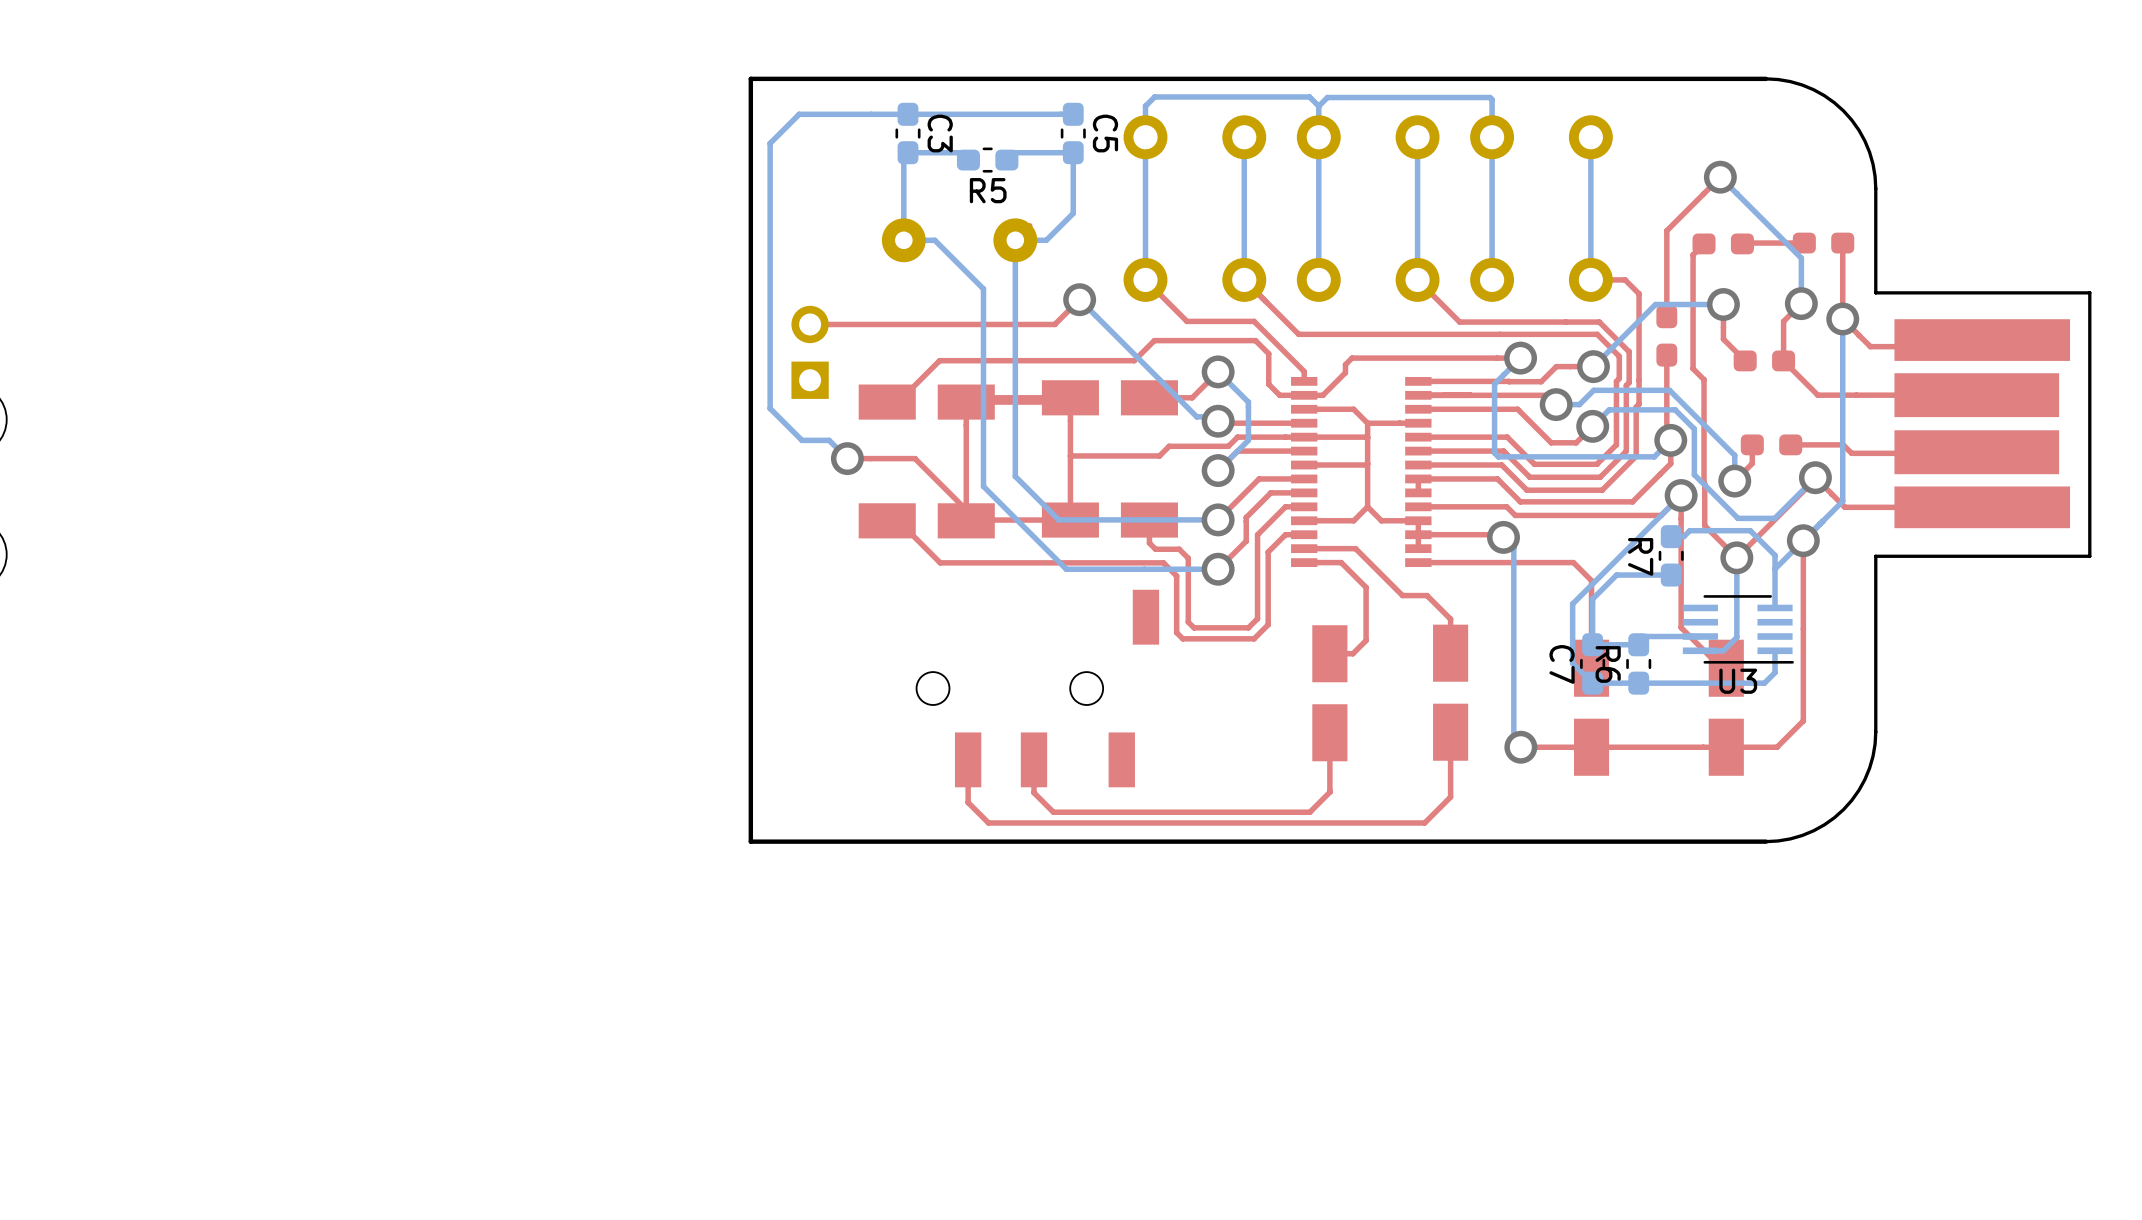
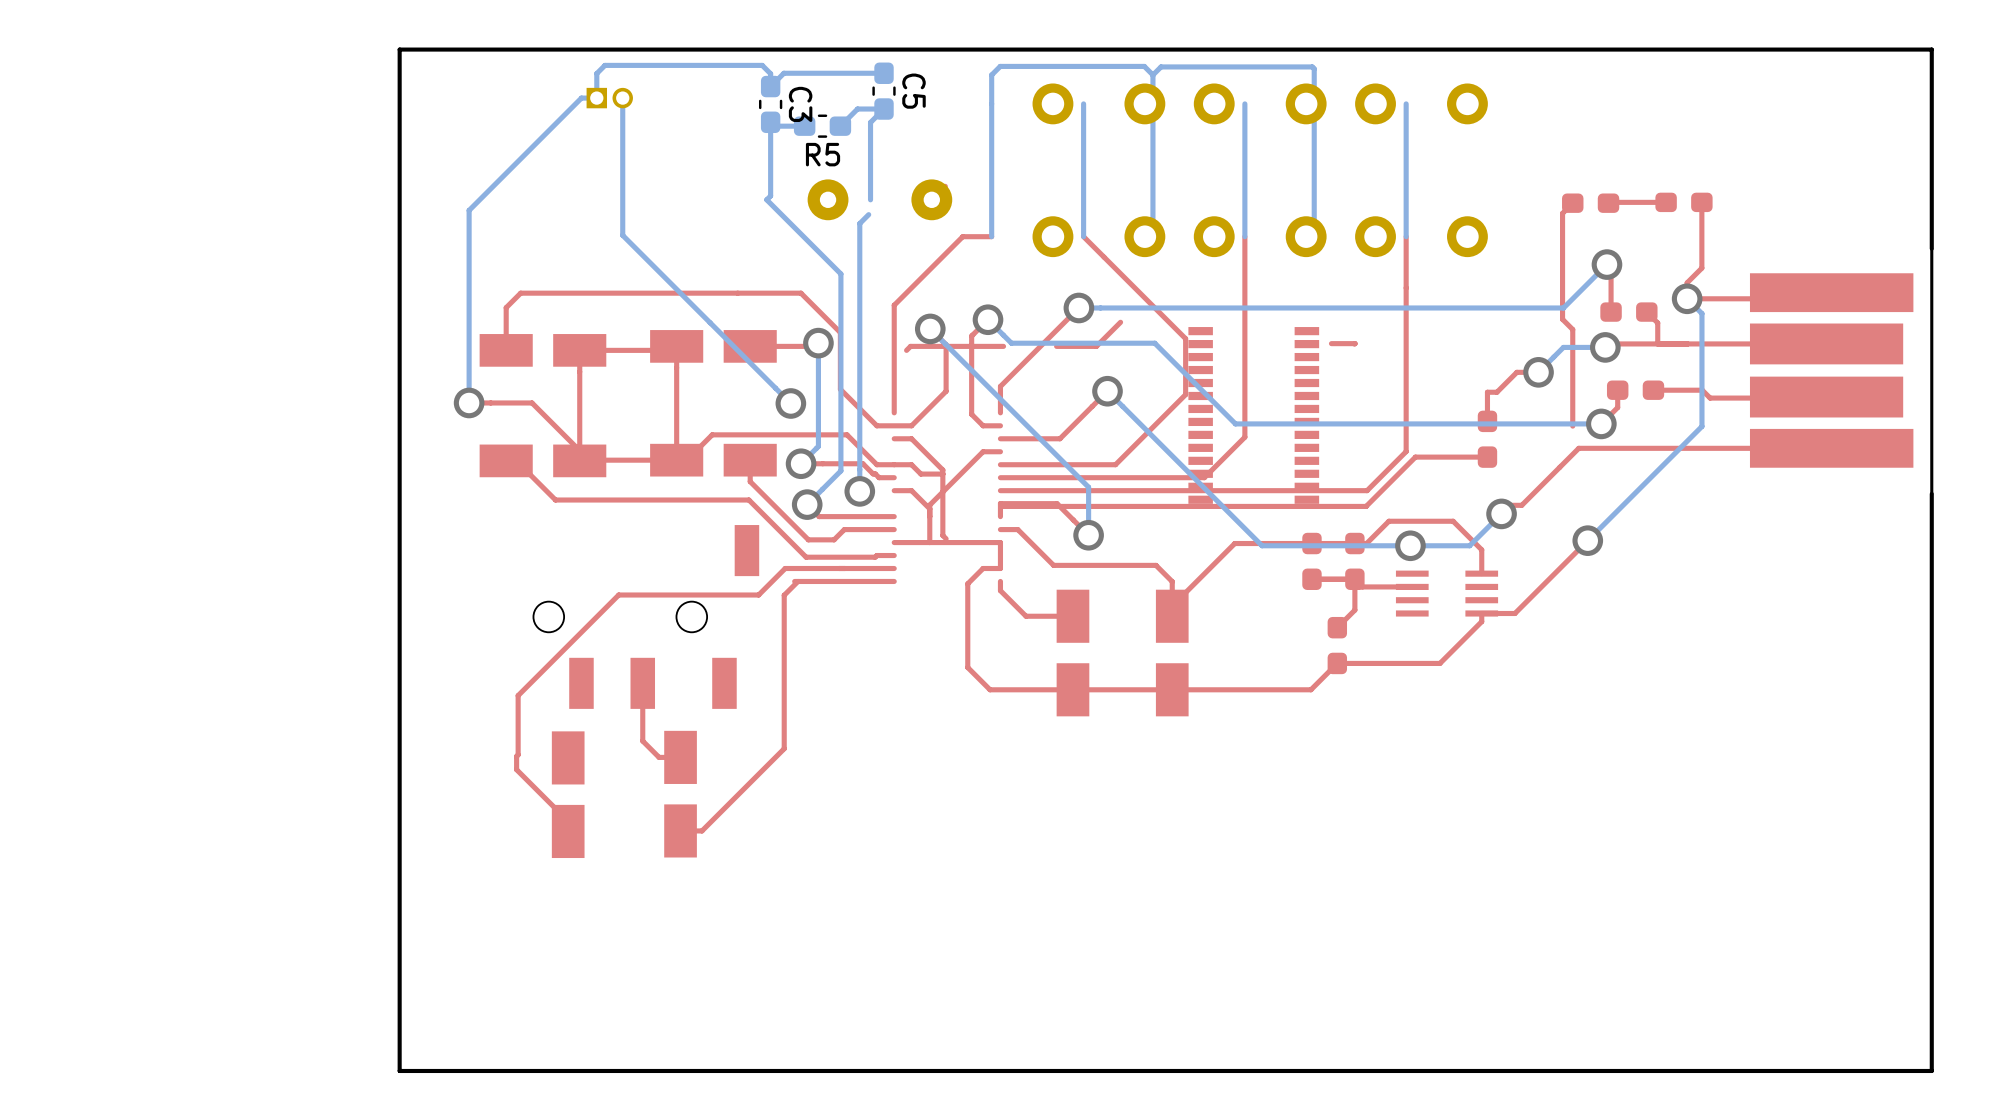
board edge: (750, 78) (750, 841) (1766, 841) (1790, 838) (1813, 830) (1834, 817) (1858, 790) (1869, 768) (1875, 731) (1875, 556) (2089, 556) -> (685, 49) (399, 49) (399, 1070) (1931, 1070) (1931, 493)
board edge: (1766, 78) (1802, 85) (1824, 95) (1851, 120) (1864, 140) (1875, 176) (1875, 292) (2089, 292) -> (1630, 49) (1931, 49) (1931, 248)
bottom track: (1154, 96) (1145, 106) (1145, 279) -> (1061, 66) (1000, 66) (991, 75) (991, 236)
bottom track: (1243, 96) (1309, 96) (1318, 106) -> (1144, 66) (1152, 75)
bottom track: (1327, 97) (1318, 106) -> (1222, 66) (1161, 66) (1152, 75)
bottom track: (1424, 97) (1490, 97) (1492, 99) (1492, 279) -> (1312, 66) (1314, 68) (1314, 236)
bottom track: none -> (884, 73) (783, 73) (770, 86) (770, 73) (762, 65) (604, 65) (596, 73) (596, 98) (581, 98) (469, 210) (469, 402)
bottom track: (1318, 106) (1318, 279) -> (1152, 75) (1152, 236)
bottom track: (1073, 114) (799, 114) (770, 143) (770, 408) (801, 440) (829, 440) (847, 458) -> none
part: none -> (609, 98)
bottom track: none -> (622, 98) (622, 235) (790, 403)
C3 position: (907, 133) -> (770, 104)
C5 position: (1073, 133) -> (884, 91)
bottom track: (1244, 137) (1244, 279) -> (1083, 103) (1083, 236)
bottom track: (1417, 137) (1417, 279) -> (1244, 103) (1244, 236)
bottom track: (1590, 137) (1590, 279) -> (1406, 103) (1406, 236)
bottom track: (968, 160) (961, 152) (907, 152) (903, 156) (903, 240) (934, 240) (983, 288) (983, 486) (1066, 569) (1218, 569) -> none
R5 position: (987, 160) -> (822, 126)
bottom track: (1006, 160) (1014, 152) (1073, 152) (1073, 213) (1046, 240) (1015, 240) (1015, 476) (1058, 519) (1218, 519) -> none
bottom track: none -> (804, 126) (774, 126) (770, 122) (770, 195) (766, 199) (840, 273) (840, 470) (807, 504)
bottom track: none -> (840, 126) (857, 109) (884, 109) (870, 122) (870, 199)
top track: (1720, 177) (1666, 230) (1666, 316) -> none
bottom track: (1720, 177) (1801, 258) (1801, 303) -> none
via: (1720, 177) -> none
bottom track: none -> (868, 214) (859, 223) (859, 491)
top track: none -> (991, 236) (962, 236) (894, 305) (894, 412)
top track: (1145, 279) (1186, 321) (1254, 321) (1304, 371) (1304, 381) -> none
top track: none -> (1083, 236) (1185, 338) (1185, 394) (1115, 464) (1000, 464)
top track: (1244, 279) (1298, 334) (1597, 334) (1619, 356) (1619, 378) (1616, 381) (1616, 444) (1596, 464) (1534, 464) (1507, 437) (1418, 437) -> none
top track: none -> (1244, 236) (1244, 437) (1204, 477) (1000, 477)
top track: (1417, 279) (1459, 322) (1599, 322) (1629, 351) (1629, 382) (1626, 385) (1626, 451) (1600, 477) (1529, 477) (1503, 451) (1418, 451) -> none
top track: none -> (1406, 236) (1406, 451) (1367, 490) (1000, 490)
top track: (1590, 279) (1625, 279) (1639, 293) (1639, 404) (1636, 407) (1636, 456) (1602, 490) (1526, 490) (1501, 465) (1418, 465) -> none
top track: (1079, 299) (1054, 324) (810, 324) -> none
bottom track: (1079, 299) (1196, 416) (1221, 416) -> none
via: (1079, 299) -> none
top track: (1801, 303) (1783, 321) (1783, 360) -> none
via: (1801, 303) -> none
top track: (1723, 304) (1723, 339) (1745, 360) -> (1606, 264) (1611, 268) (1611, 312)
bottom track: (1723, 304) (1655, 304) (1593, 366) -> none
via position: (1723, 304) -> (1606, 264)
bottom track: none -> (1606, 264) (1563, 307) (1078, 307)
top track: (1842, 313) (1842, 318) (1870, 346) -> (1701, 268) (1687, 282) (1687, 298) (1727, 298)
bottom track: (1842, 318) (1842, 501) (1775, 569) -> none
via: (1842, 318) -> none
part position: (1666, 335) -> (1487, 439)
bottom track: none -> (1687, 298) (1701, 313) (1701, 426) (1587, 540)
via: none -> (1687, 298)
part: (810, 352) -> none
top track: (1666, 355) (1666, 436) (1670, 440) (1670, 463) (1632, 501) (1520, 501) (1497, 478) (1418, 478) (1418, 492) -> none
top track: none -> (1078, 307) (1000, 386) (1000, 412)
via: none -> (1078, 307)
top track: (1520, 358) (1352, 358) (1345, 364) (1345, 372) (1322, 395) (1279, 395) (1268, 384) (1268, 353) (1255, 340) (1154, 340) (1134, 360) (939, 360) (898, 402) (887, 402) -> none
bottom track: (1520, 358) (1494, 384) (1494, 452) (1498, 456) (1654, 456) (1670, 440) -> none
via: (1520, 358) -> none
top track: (1593, 366) (1556, 366) (1541, 381) (1418, 381) -> none
via: (1593, 366) -> none
top track: none -> (987, 319) (971, 336) (971, 414) (983, 425) (1000, 425)
via: none -> (987, 319)
bottom track: (1218, 371) (1248, 402) (1248, 440) (1218, 470) -> none
via: (1218, 371) -> none
top track: (1795, 372) (1817, 395) -> (1657, 323) (1657, 343)
top track: none -> (930, 328) (946, 344) (946, 391) (911, 425) (876, 425) (840, 389) (840, 332) (800, 293) (520, 293) (506, 307) (506, 350)
bottom track: none -> (930, 328) (1088, 487) (1088, 535)
via: none -> (930, 328)
top track: none -> (818, 343) (815, 346) (770, 346)
bottom track: none -> (818, 343) (818, 446) (801, 463)
via: none -> (818, 343)
top track: (1418, 395) (1546, 395) (1556, 404) -> none
top track: none -> (1678, 343) (1608, 343) (1605, 347)
part: none -> (713, 346)
part: (1109, 397) -> none
bottom track: none -> (1605, 347) (1563, 347) (1538, 372)
via: none -> (1605, 347)
part: none -> (542, 350)
part: (926, 402) -> none
bottom track: (1556, 404) (1579, 404) (1593, 390) (1669, 390) (1734, 455) (1734, 481) -> (987, 319) (1011, 343) (1154, 343) (1235, 423) (1601, 423)
via: (1556, 404) -> none
top track: (1304, 409) (1353, 409) (1367, 423) -> none
top track: (1418, 409) (1517, 409) (1551, 442) (1576, 442) (1592, 426) -> none
top track: (1221, 416) (1227, 423) (1304, 423) -> none
via: (1218, 421) -> none
top track: (1367, 423) (1367, 506) -> none
top track: none -> (1538, 372) (1516, 372) (1496, 392) (1487, 392) (1487, 421)
bottom track: (1592, 426) (1609, 409) (1675, 409) (1694, 429) (1694, 474) (1738, 518) (1774, 518) (1815, 477) -> none
via: (1592, 426) -> none
top track: (1367, 437) (1237, 437) (1228, 446) (1169, 446) (1159, 455) (1070, 455) -> none
via position: (1670, 440) -> (1538, 372)
top track: none -> (1107, 391) (1059, 438) (1000, 438)
bottom track: none -> (1107, 391) (1262, 545) (1469, 545) (1501, 513)
via: none -> (1107, 391)
top track: (1304, 451) (1237, 451) (1218, 470) -> none
via: none -> (469, 402)
top track: (847, 458) (915, 458) (977, 520) (1092, 520) -> (469, 402) (532, 402) (589, 460) (697, 460)
via position: (847, 458) -> (790, 403)
top track: (1367, 463) (1304, 465) -> none
via: (1218, 470) -> none
via: (1815, 477) -> none
top track: (1304, 478) (1259, 478) (1218, 519) -> none
top track: (1704, 483) (1704, 525) (1736, 557) (1815, 477) (1845, 507) -> (1501, 513) (1510, 505) (1521, 505) (1578, 448) (1704, 448)
top track: (1304, 492) (1270, 492) (1246, 517) (1246, 541) (1218, 569) -> none
bottom track: (1681, 495) (1572, 604) (1572, 663) (1592, 683) (1764, 683) (1775, 672) (1775, 650) -> none
via: (1681, 495) -> none
top track: none -> (894, 438) (911, 438) (942, 470) (942, 535) (946, 538)
top track: (1304, 506) (1285, 506) (1257, 534) (1257, 618) (1248, 627) (1194, 627) (1188, 622) (1188, 558) (1179, 549) (1155, 549) (1149, 543) (1149, 520) -> none
top track: (1367, 506) (1381, 520) (1418, 520) (1418, 548) -> none
top track: (1367, 506) (1353, 520) (1304, 520) -> none
top track: (1418, 506) (1506, 506) (1515, 515) (1661, 515) (1681, 495) (1681, 627) (1726, 672) -> none
top track: none -> (1000, 451) (983, 451) (929, 505) (929, 542)
top track: none -> (1487, 457) (1415, 457) (1366, 506) (1003, 506) (1000, 503)
via: (1218, 519) -> none
top track: none -> (506, 460) (516, 460) (555, 500) (748, 500) (806, 557) (894, 555)
part: none -> (542, 460)
top track: none -> (686, 460) (712, 434) (847, 434) (876, 464) (911, 464) (920, 474) (942, 474)
part: none -> (713, 460)
top track: none -> (750, 460) (750, 481) (808, 539) (834, 539) (844, 529) (894, 529)
top track: (887, 520) (898, 520) (940, 562) (1163, 562) (1176, 576) (1176, 632) (1182, 638) (1254, 638) (1268, 624) (1268, 552) (1285, 534) (1304, 534) -> none
part: (926, 520) -> none
top track: (1070, 520) (1070, 397) (1066, 402) (966, 402) (966, 520) -> (676, 460) (676, 346) (672, 350) (579, 350) (579, 460)
part: (1109, 520) -> none
top track: none -> (801, 463) (862, 463) (879, 477) (894, 477)
via: none -> (801, 463)
top track: (1418, 534) (1500, 534) (1503, 537) -> none
bottom track: (1671, 536) (1683, 536) (1689, 530) (1750, 530) (1775, 555) (1775, 607) -> none
bottom track: (1503, 537) (1513, 547) (1513, 740) (1520, 747) -> none
via: (1503, 537) -> none
top track: (1803, 540) (1803, 720) (1777, 747) (1520, 747) -> none
via: (1803, 540) -> none
top track: (1308, 548) (1355, 548) (1402, 595) (1427, 595) (1450, 619) (1450, 653) -> none
top track: none -> (894, 490) (911, 490) (929, 508)
via: none -> (859, 491)
R7 side: bottom (1671, 555) -> top (1337, 645)
bottom track: (1736, 557) (1736, 637) (1723, 650) (1700, 650) -> none
via position: (1736, 557) -> (1587, 540)
top track: (1313, 562) (1341, 562) (1366, 587) (1366, 640) (1352, 653) (1329, 653) -> none
top track: (1418, 562) (1573, 562) (1591, 580) (1591, 668) -> none
top track: none -> (1000, 503) (1000, 516)
top track: none -> (1000, 503) (1056, 503) (1088, 535)
top track: none -> (807, 504) (819, 516) (894, 516)
via: none -> (807, 504)
via: (1218, 569) -> none
bottom track: (1671, 575) (1616, 575) (1592, 599) (1592, 644) (1638, 644) (1646, 636) (1700, 636) -> none
via: none -> (1501, 513)
top track: none -> (1000, 529) (1017, 529) (1053, 565) (1156, 565) (1172, 581) (1172, 616)
via: none -> (1088, 535)
top track: none -> (1587, 540) (1514, 613) (1481, 613) (1481, 621) (1439, 663) (1337, 663) (1310, 689) (990, 689) (967, 667) (967, 583) (983, 568) (1000, 568) (1000, 542) (894, 542)
via: none -> (1410, 545)
U3 side: bottom (1738, 629) -> top (1447, 593)
top track: none -> (894, 568) (785, 568) (758, 595) (618, 595) (518, 695) (516, 769) (568, 821) (568, 831)
top track: none -> (1481, 573) (1481, 549) (1453, 521) (1388, 521) (1366, 543) (1234, 543) (1172, 606)
top track: none -> (1354, 579) (1311, 579)
top track: none -> (1354, 579) (1362, 586) (1412, 586)
top track: none -> (1354, 579) (1354, 610) (1337, 627)
top track: none -> (798, 581) (784, 595) (784, 748) (702, 830) (680, 830)
top track: none -> (894, 581) (794, 581)
top track: none -> (1000, 581) (1000, 590) (1026, 616) (1072, 616)
C7 side: bottom (1592, 663) -> top (1311, 561)
R6 side: bottom (1638, 663) -> top (1354, 561)
part position: (1037, 688) -> (646, 616)
part: (1450, 692) -> none
part position: (1329, 693) -> (1172, 653)
part: (1591, 707) -> none
part: (1726, 707) -> none
part: none -> (1072, 653)
top track: (1329, 732) (1330, 791) (1309, 812) (1053, 812) (1033, 792) (1033, 759) -> none
top track: (1450, 732) (1450, 797) (1424, 822) (988, 822) (968, 802) (968, 759) -> none
via: (1520, 747) -> none
top track: none -> (642, 683) (642, 741) (659, 757) (680, 757)
part: none -> (680, 794)
part: none -> (568, 794)

